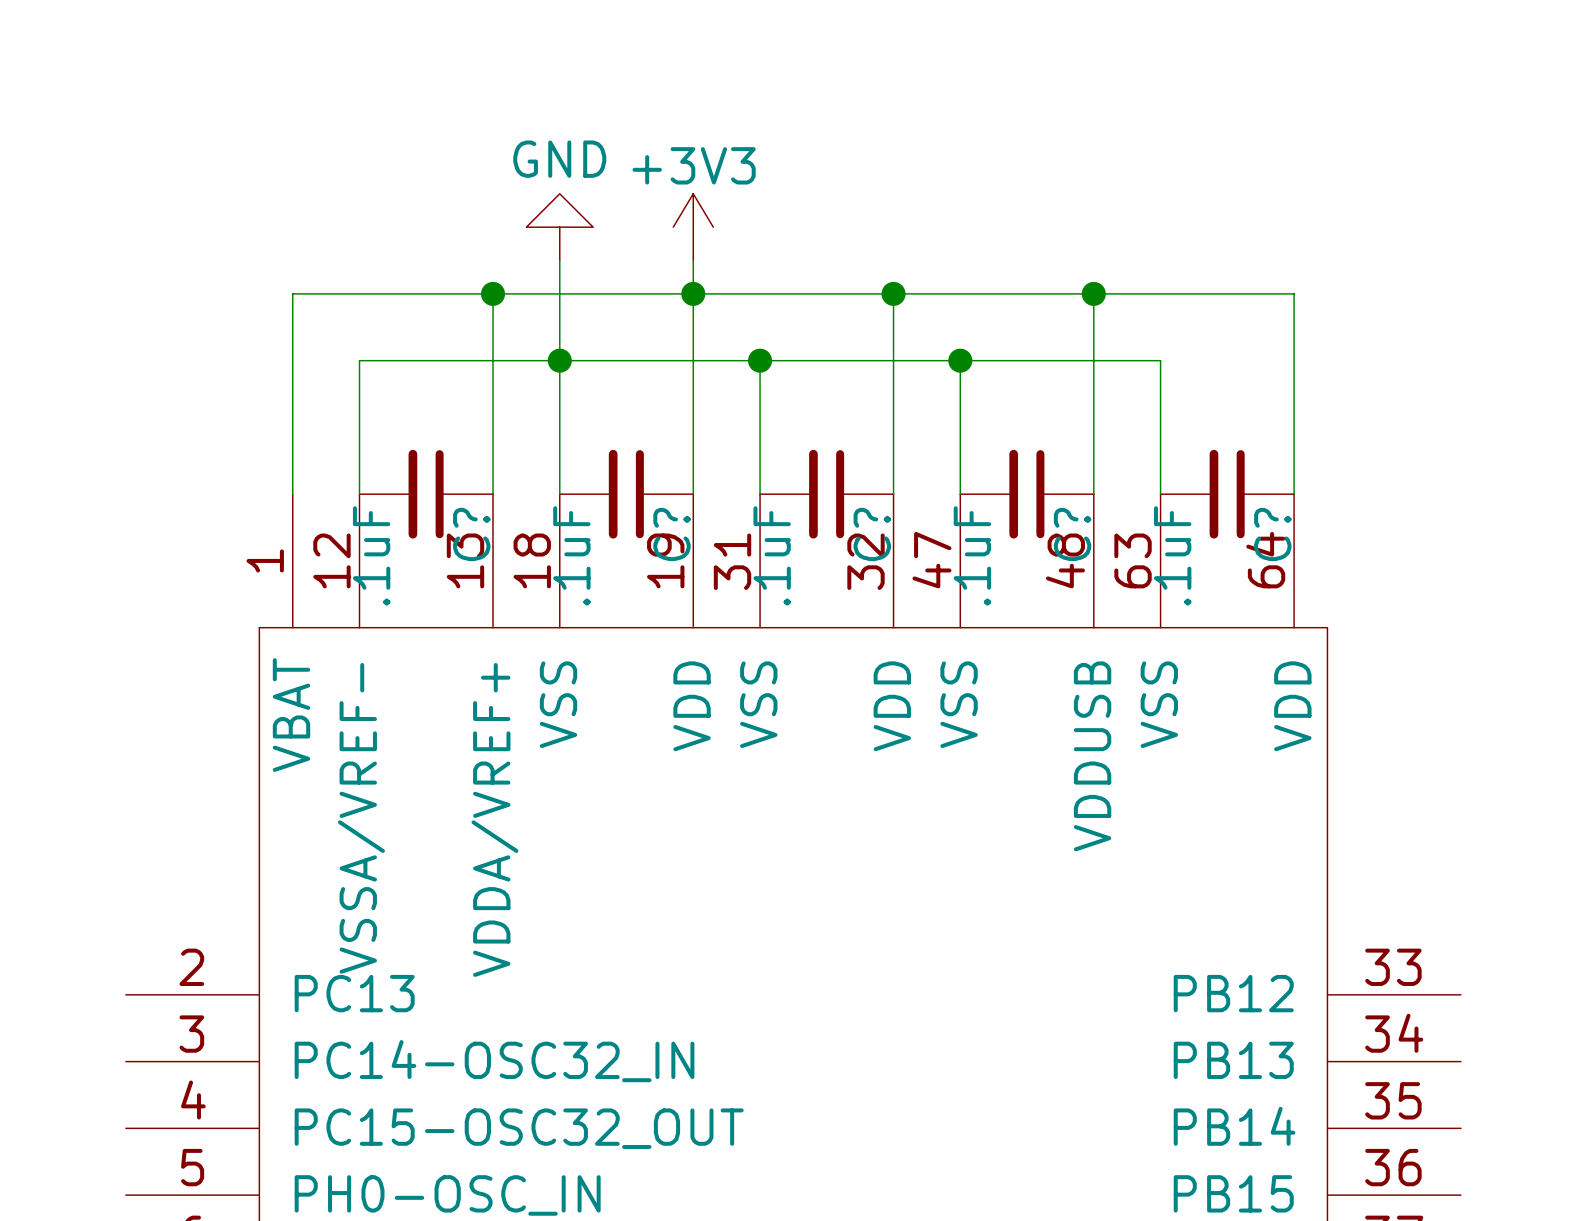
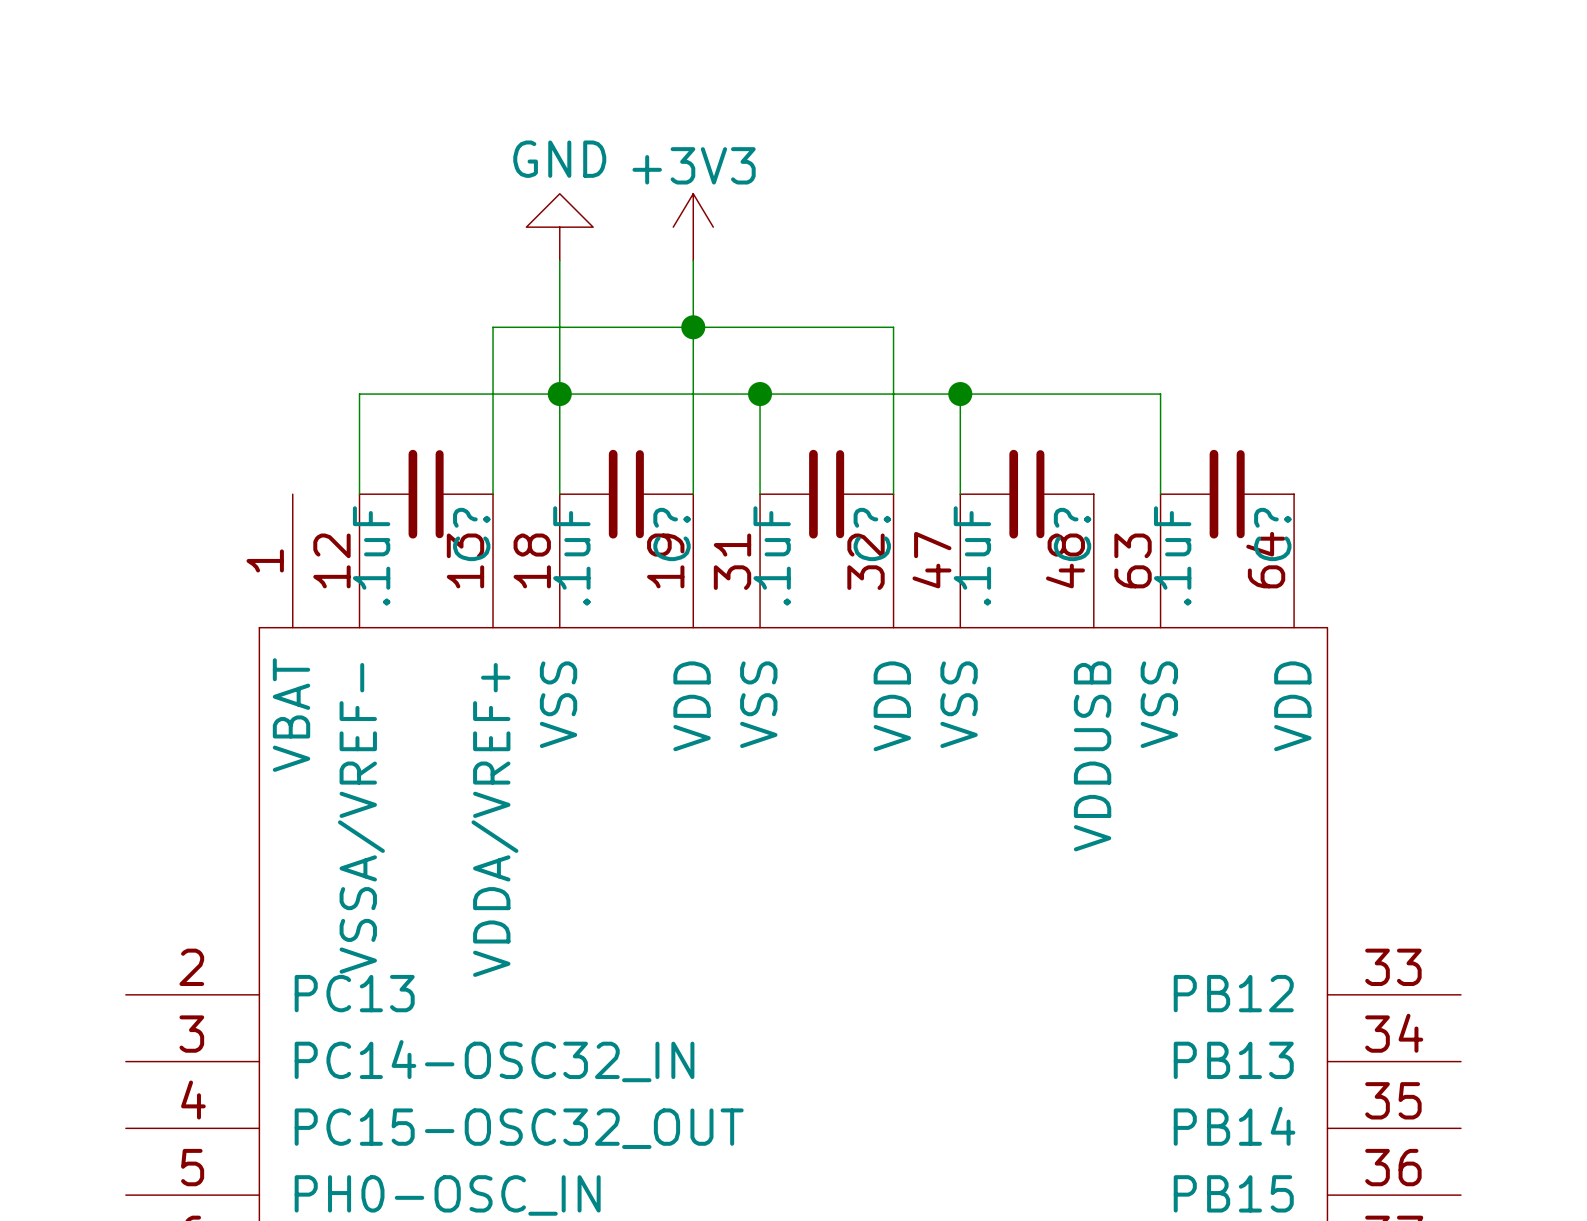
wire: (493, 293) (493, 327) -> (893, 327) (493, 327)
junction: (493, 293) -> none
junction position: (693, 293) -> (693, 327)
wire: (893, 293) (893, 327) -> none
junction: (893, 293) -> none
wire: (1093, 293) (1093, 494) -> none
junction: (1093, 293) -> none
junction position: (559, 360) -> (559, 394)
wire: (760, 360) (760, 394) -> none
junction position: (760, 360) -> (760, 394)
wire: (960, 360) (960, 394) -> none
junction position: (960, 360) -> (960, 394)
wire: (359, 394) (359, 360) (1160, 360) (1160, 394) -> (359, 394) (1160, 394)
wire: (292, 494) (292, 293) (1294, 293) (1294, 494) -> none

